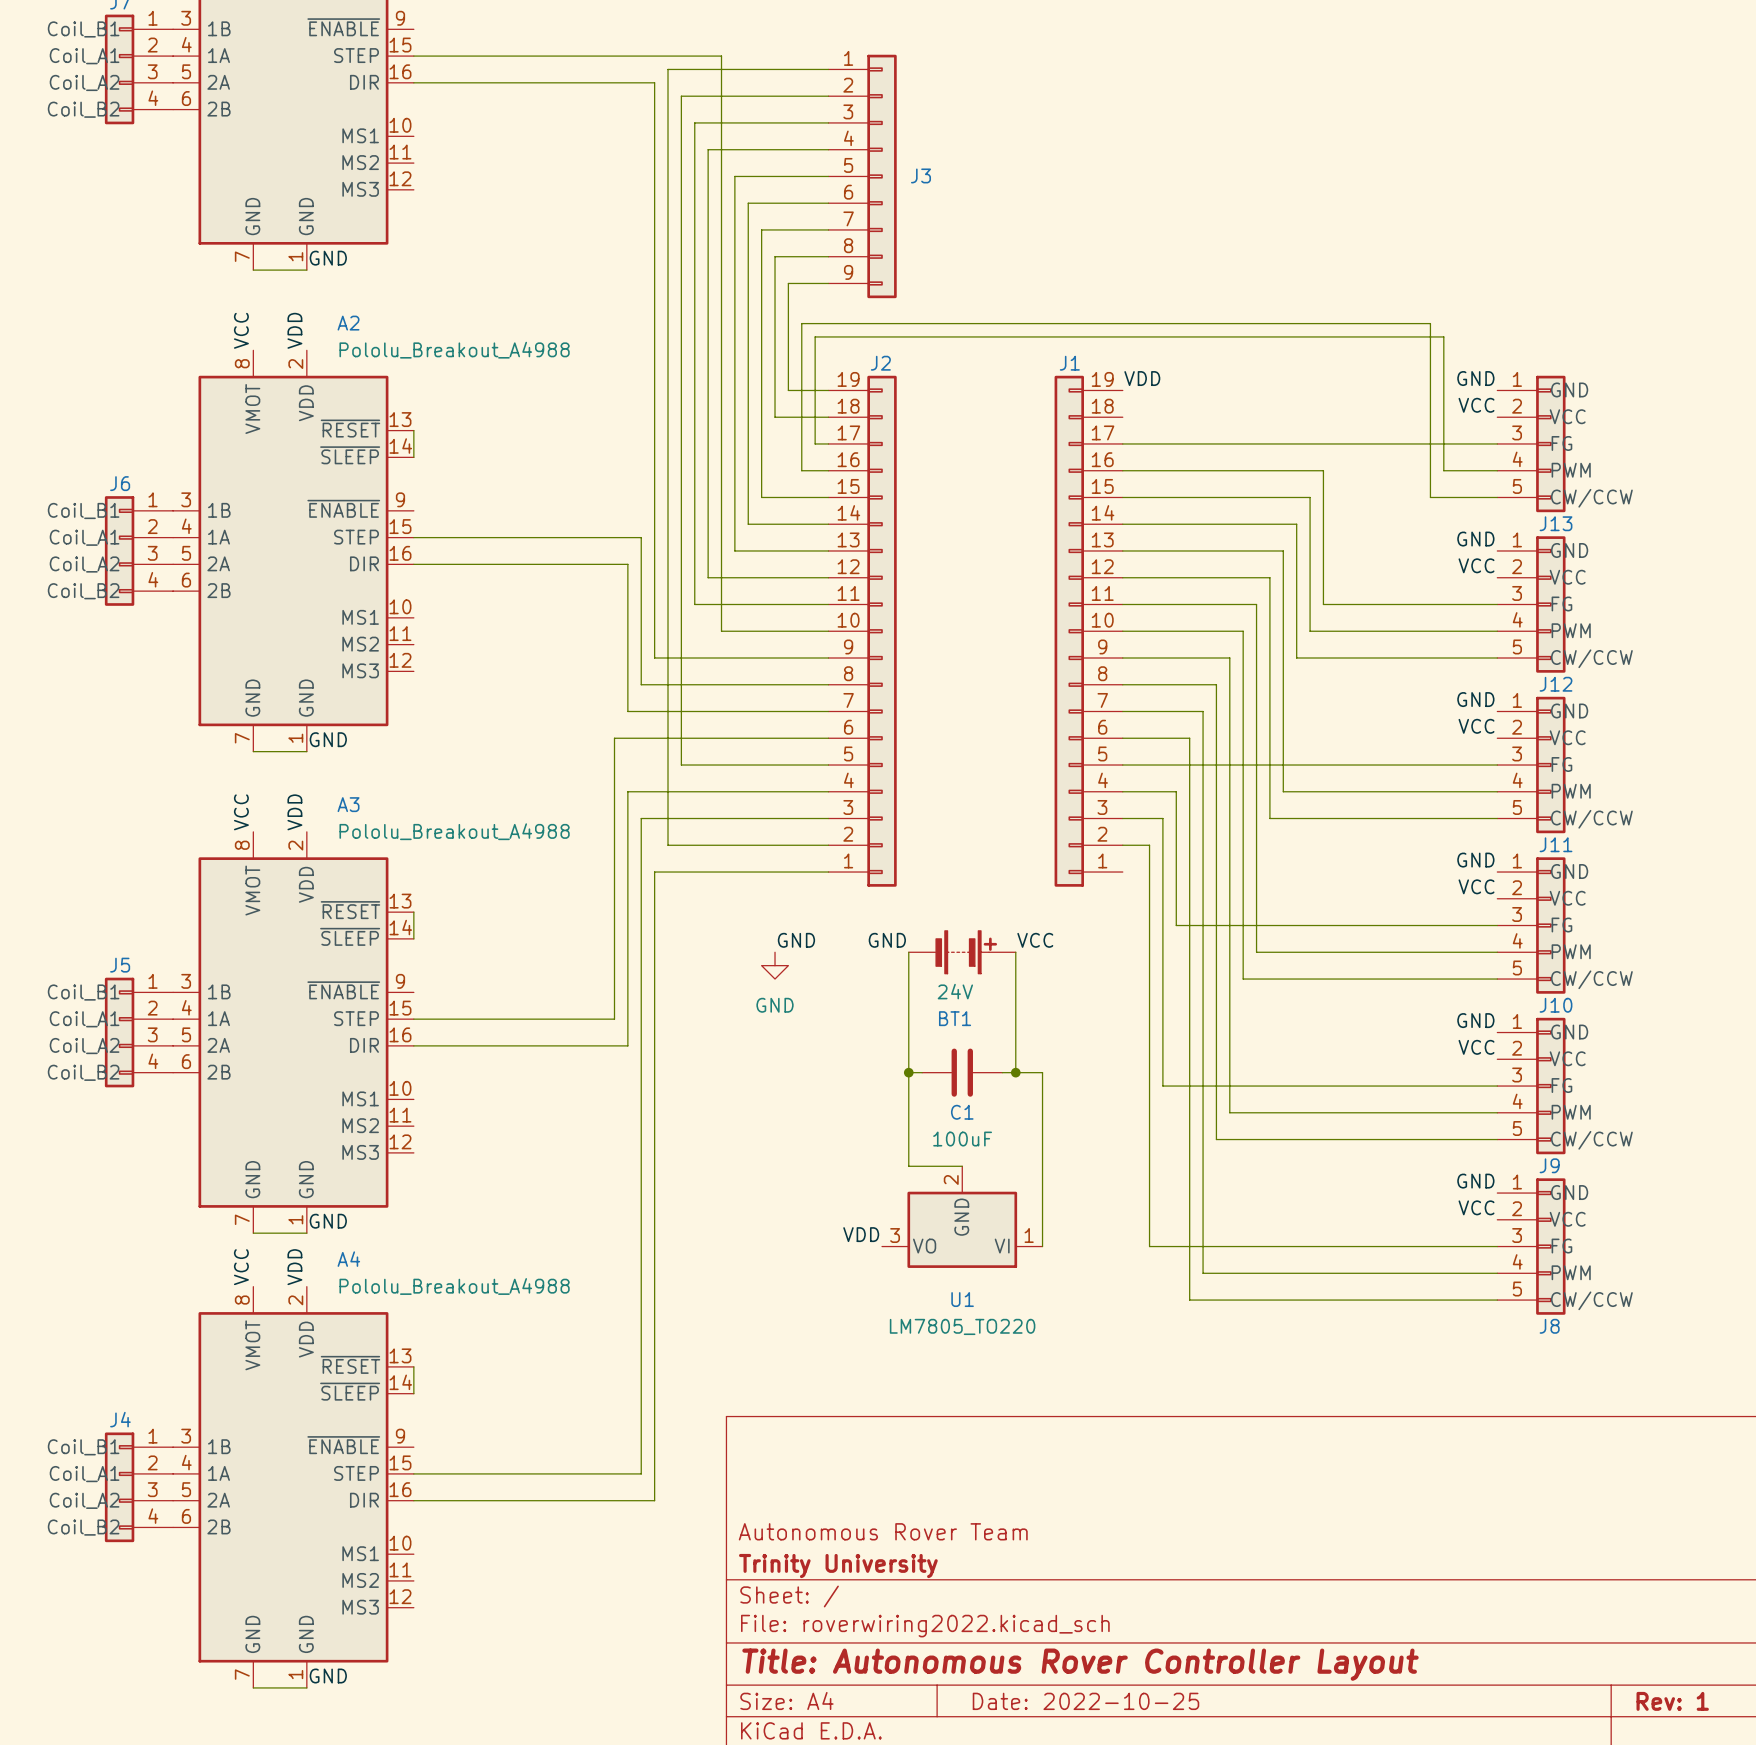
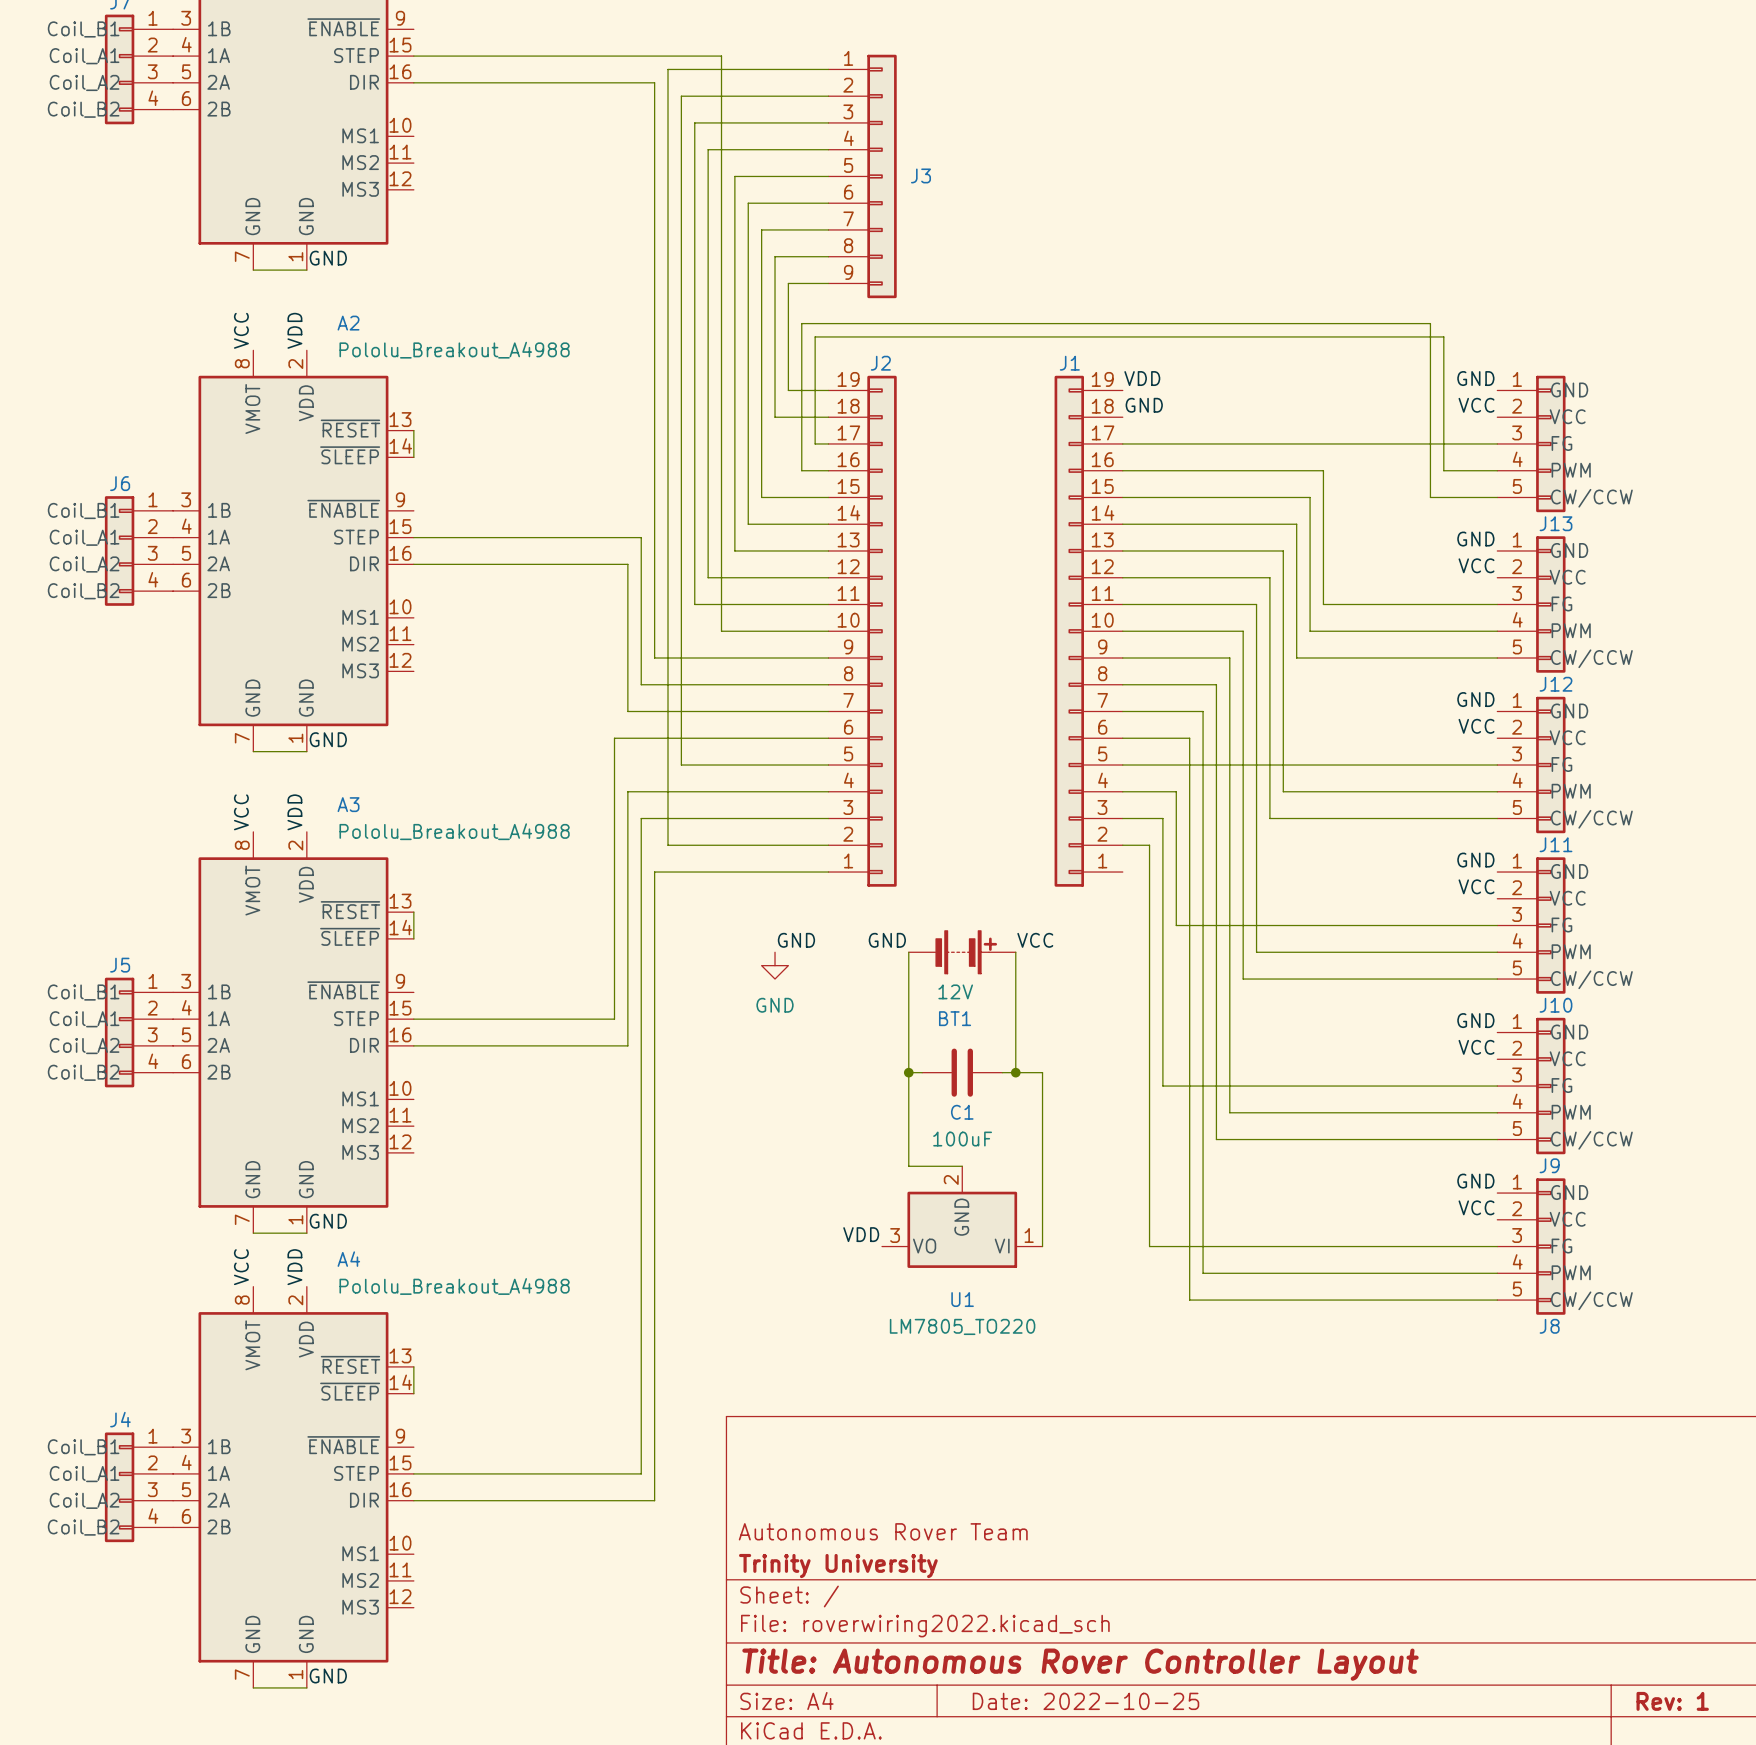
label: none -> GND (1144, 405)
BT1 value: 24V (955, 991) -> 12V (955, 991)

